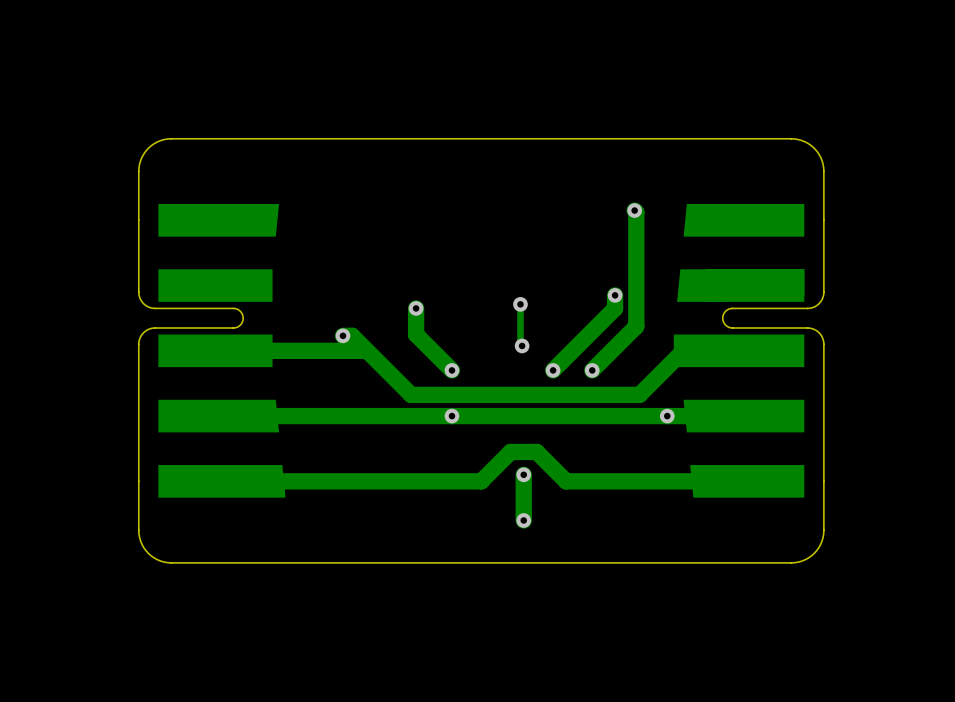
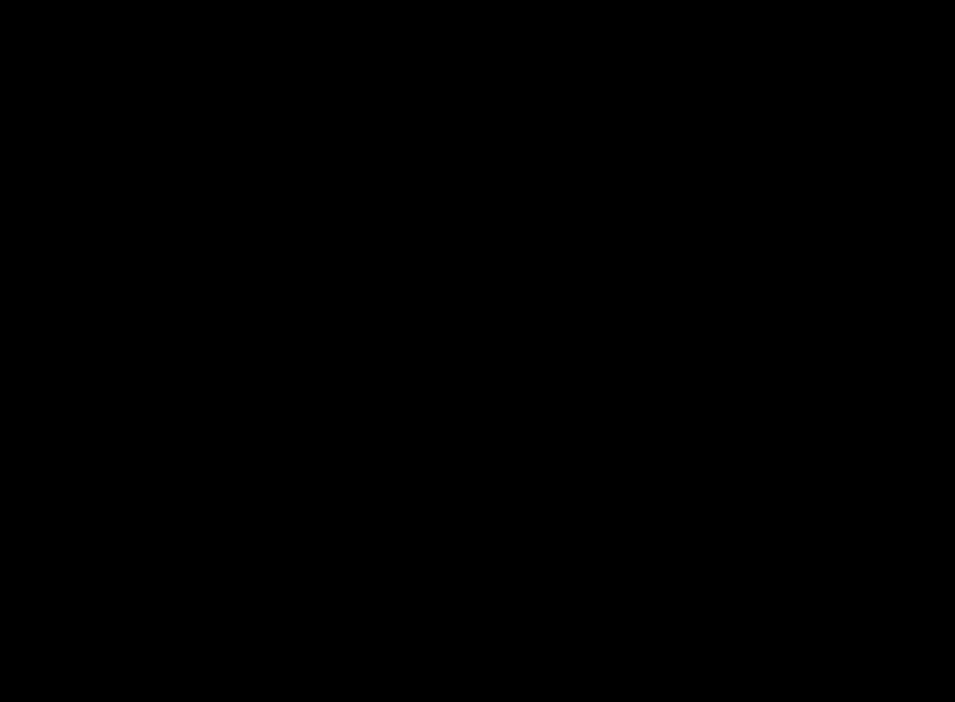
track: (634, 210) (636, 212) (636, 326) (592, 370) -> none
via: (634, 210) -> none
board edge: (823, 220) (822, 160) (816, 151) (808, 143) (791, 138) (167, 138) (151, 145) (140, 160) (138, 220) -> none
track: (615, 295) (615, 308) (553, 370) -> none
via: (615, 295) -> none
track: (520, 304) (520, 344) (522, 345) -> none
via: (520, 304) -> none
track: (416, 308) (416, 334) (451, 370) -> none
via: (416, 308) -> none
track: (342, 335) (352, 335) (411, 394) (639, 394) (683, 350) (739, 350) -> none
via: (342, 335) -> none
via: (522, 345) -> none
part: (211, 350) -> none
track: (365, 350) (215, 350) -> none
part: (749, 350) -> none
via: (451, 370) -> none
via: (553, 370) -> none
via: (592, 370) -> none
via: (451, 416) -> none
via: (667, 416) -> none
track: (745, 416) (217, 416) -> none
track: (523, 474) (523, 520) -> none
via: (523, 474) -> none
track: (748, 481) (566, 481) (536, 451) (510, 451) (481, 481) (220, 481) -> none
board edge: (823, 481) (822, 541) (816, 550) (808, 557) (791, 562) (167, 562) (151, 555) (140, 541) (138, 481) -> none
via: (523, 520) -> none

